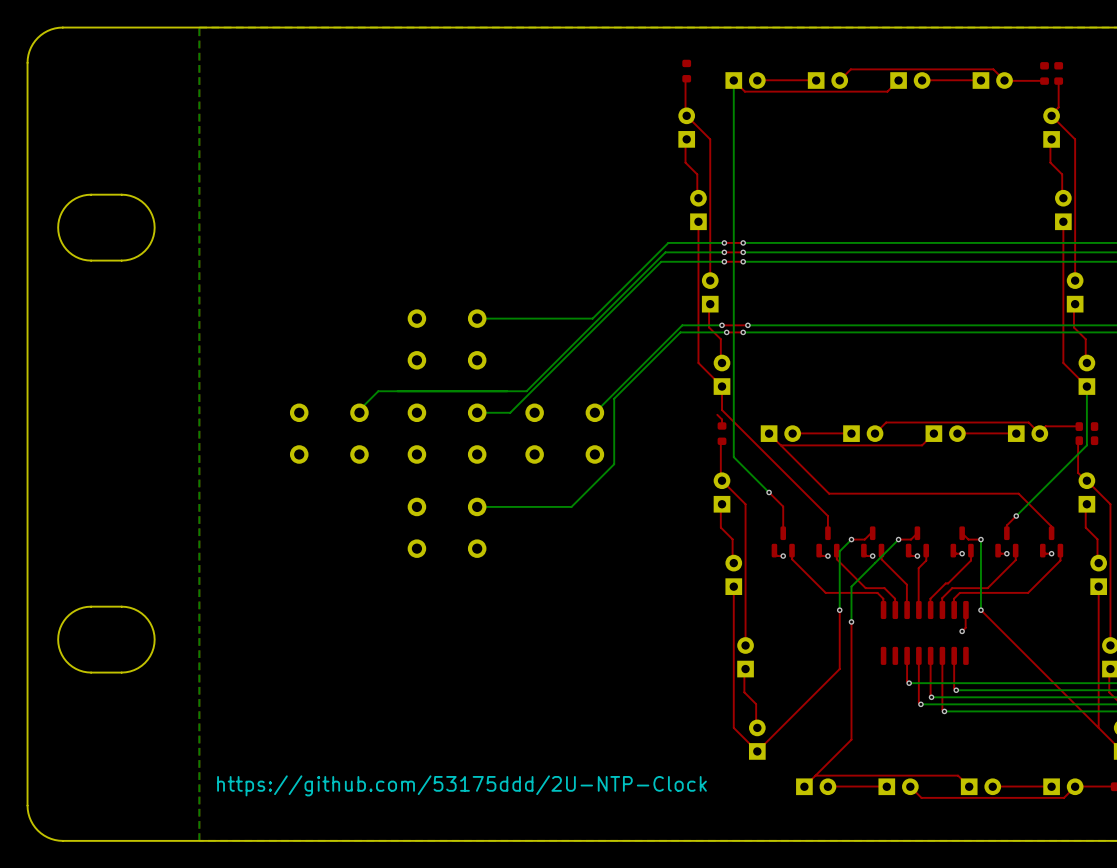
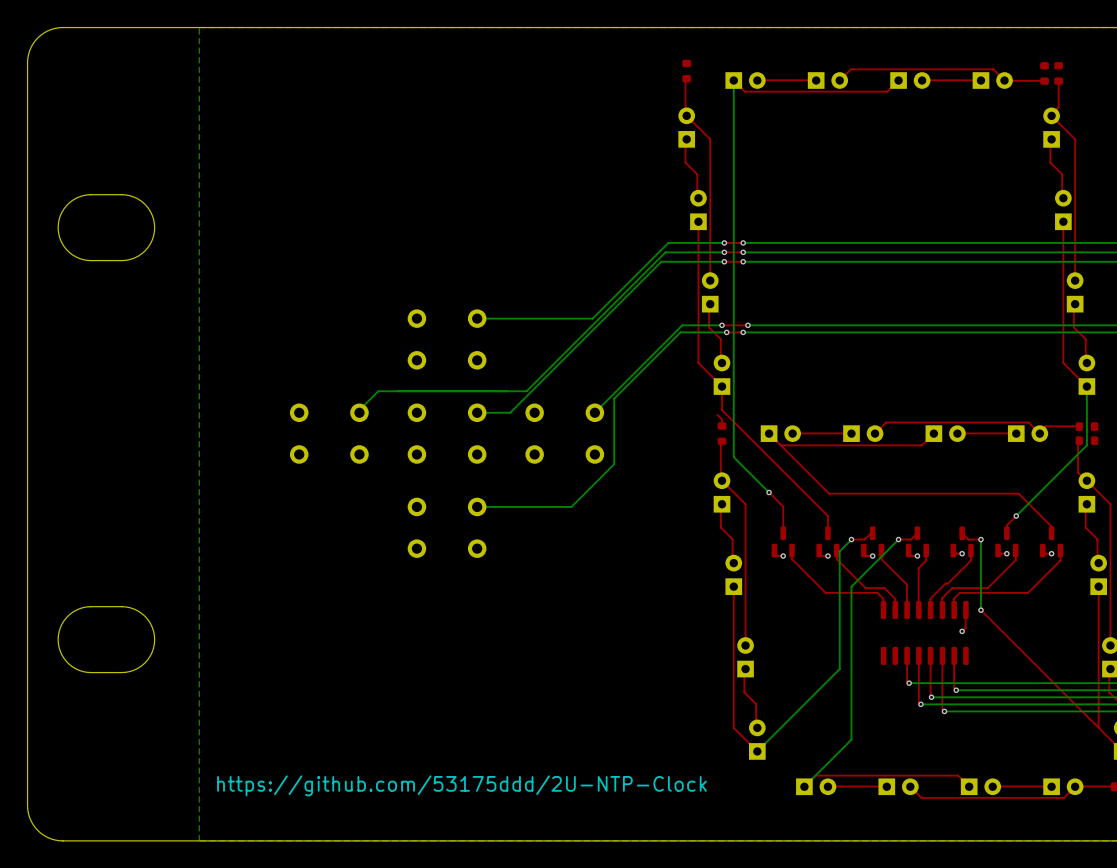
top track: (839, 610) (839, 669) (757, 751) -> none
bottom track: none -> (839, 610) (839, 669) (757, 751)
via: (839, 610) -> none
top track: (851, 621) (851, 739) (815, 775) -> none
bottom track: none -> (851, 621) (851, 739) (804, 786)
via: (851, 621) -> none

